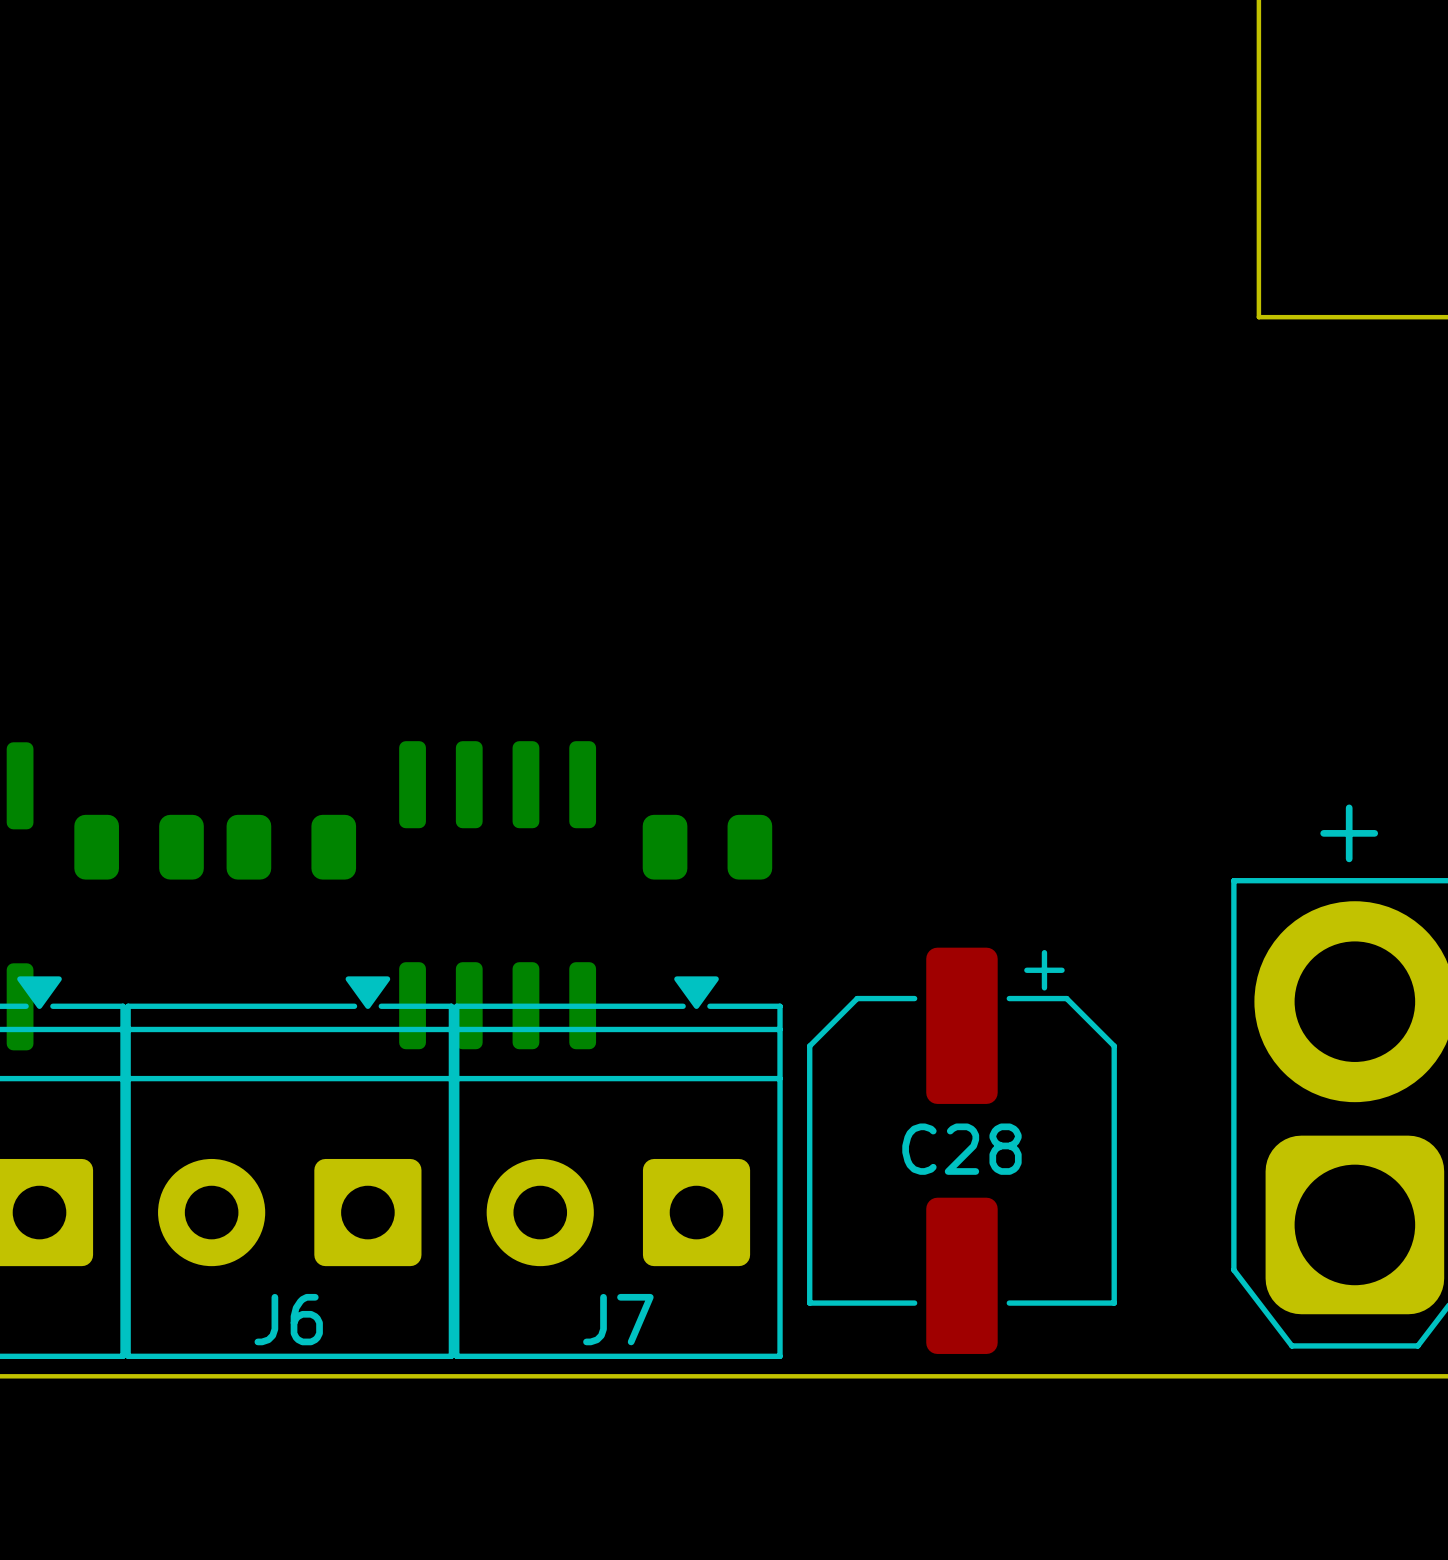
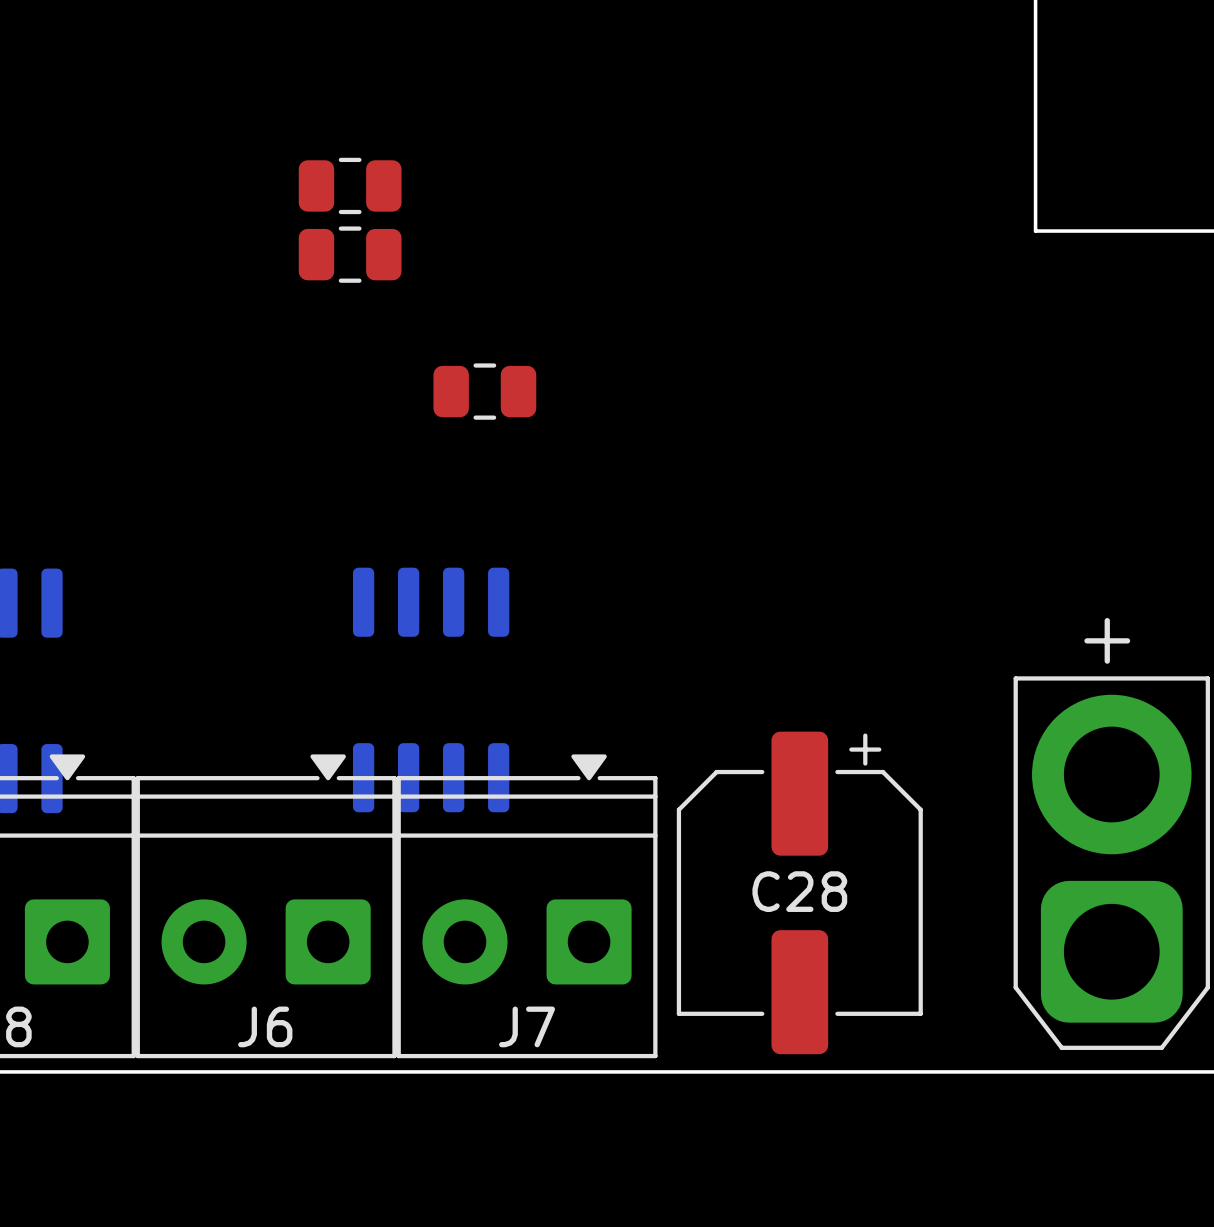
part: none -> (350, 185)
part: none -> (350, 254)
part: none -> (484, 391)
part: (139, 847) -> none
part: (291, 847) -> none
part: (707, 847) -> none

